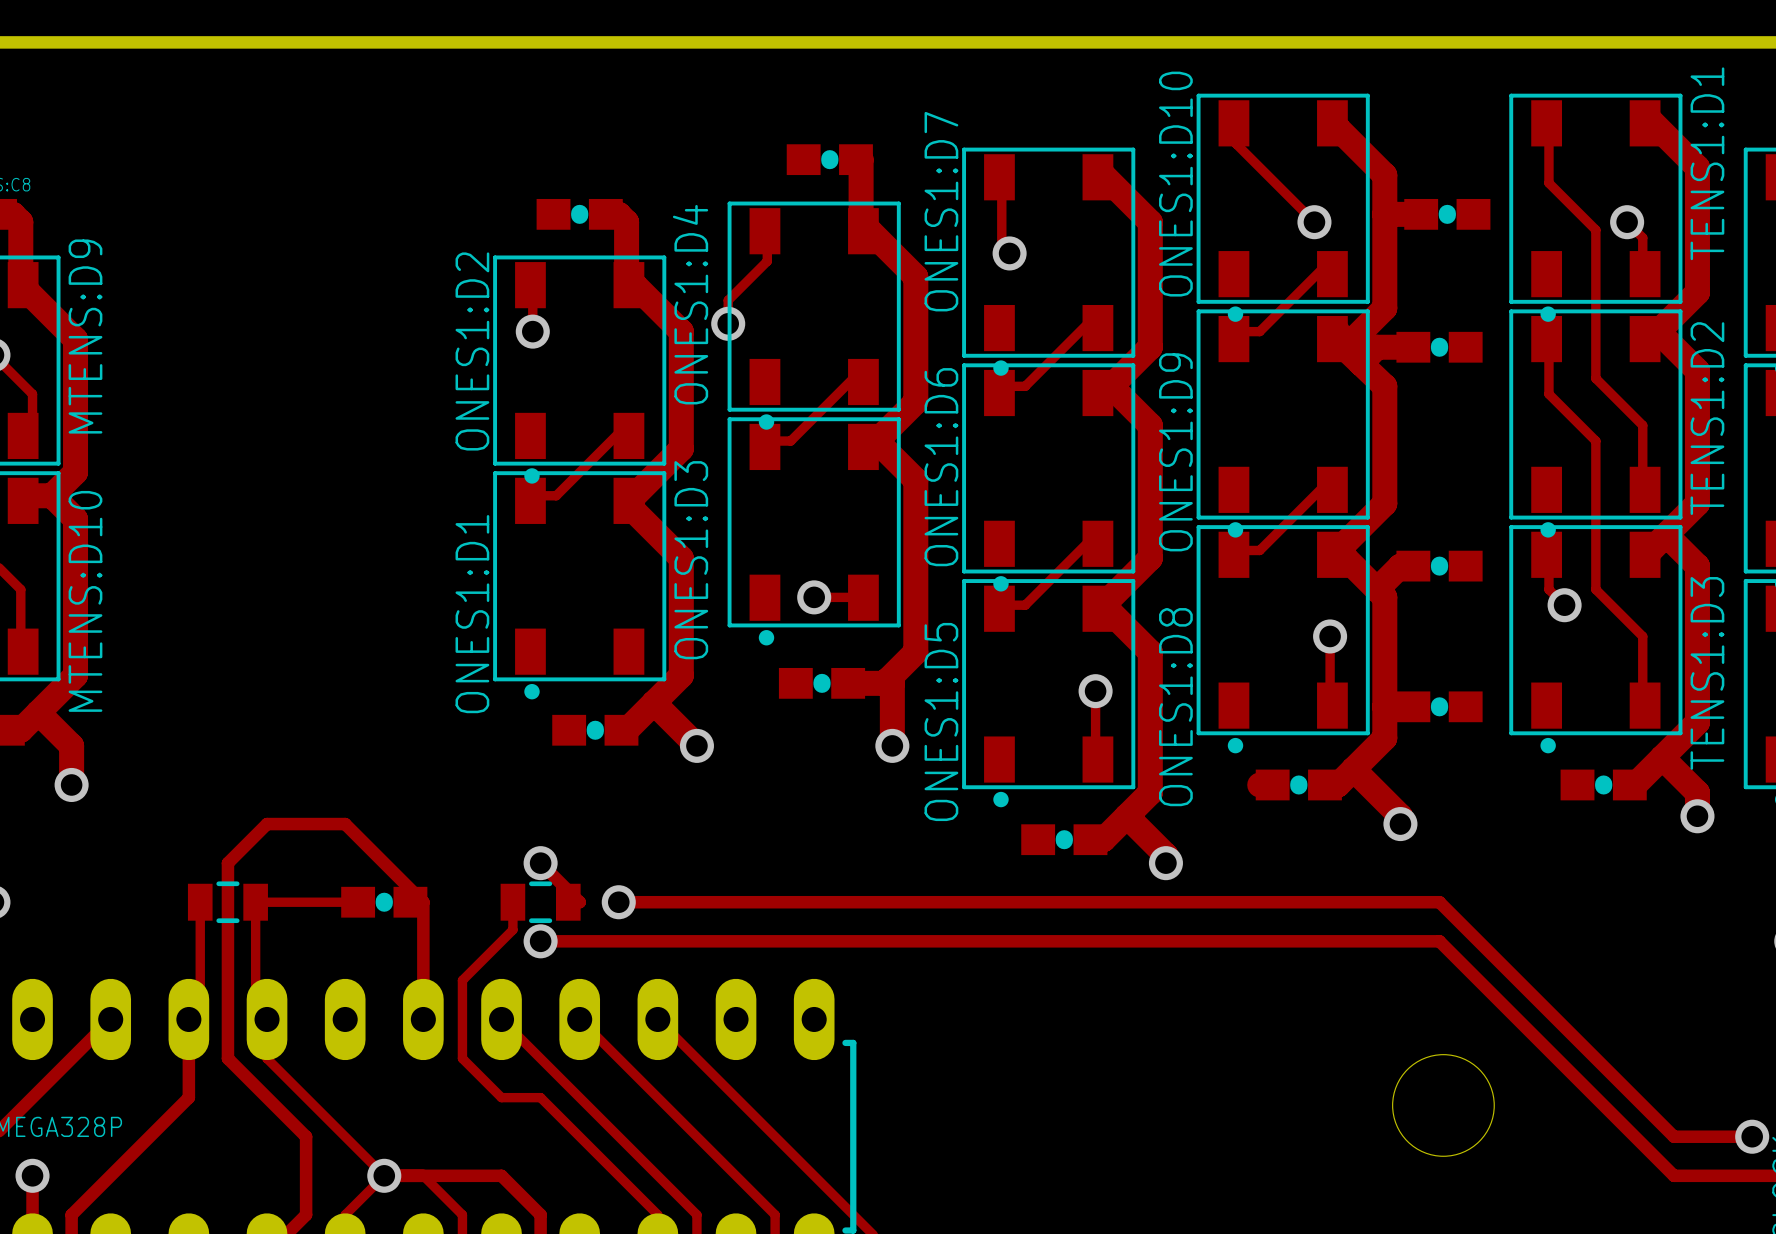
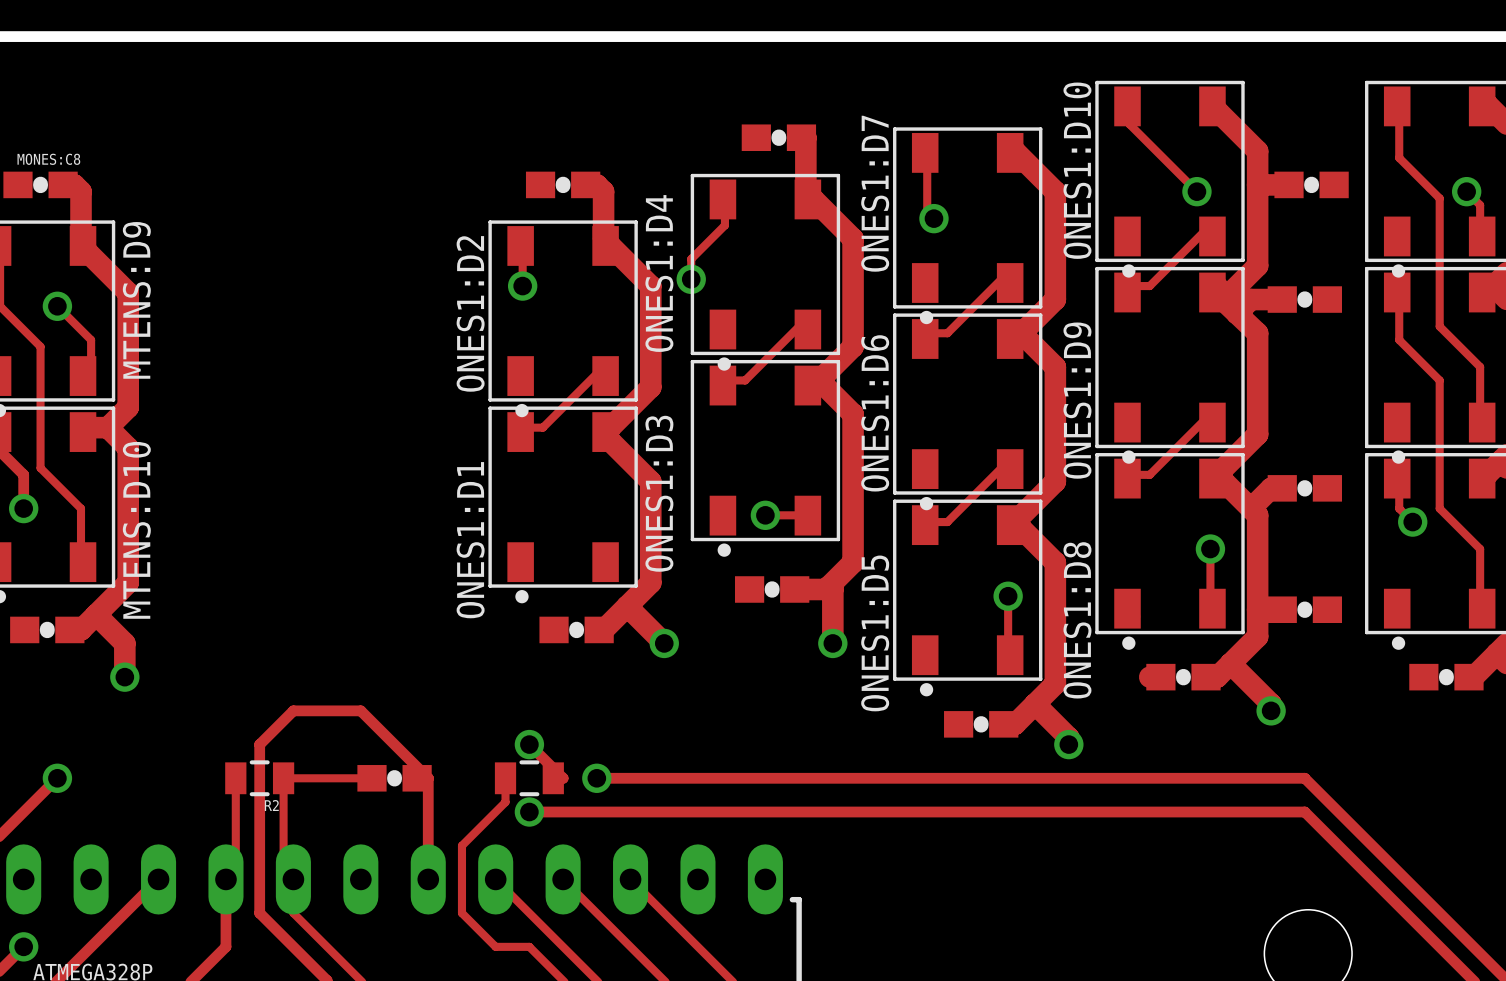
R2 name: none -> R2 (271, 805)

